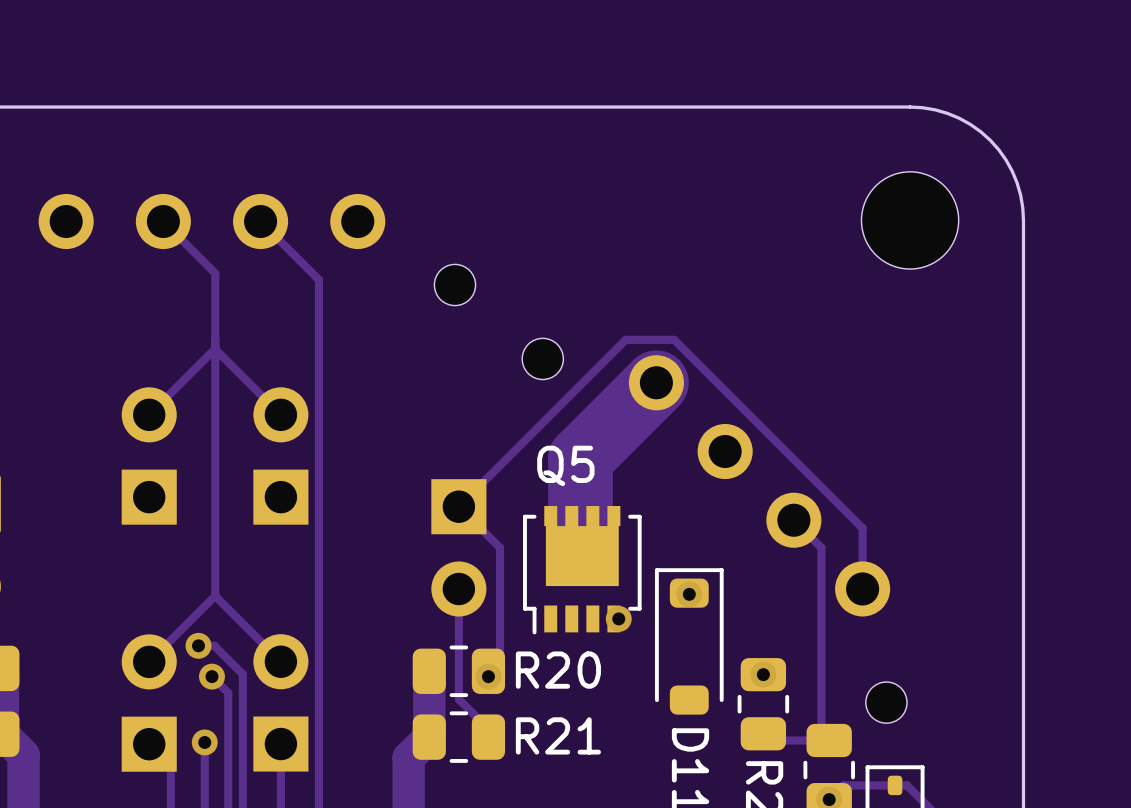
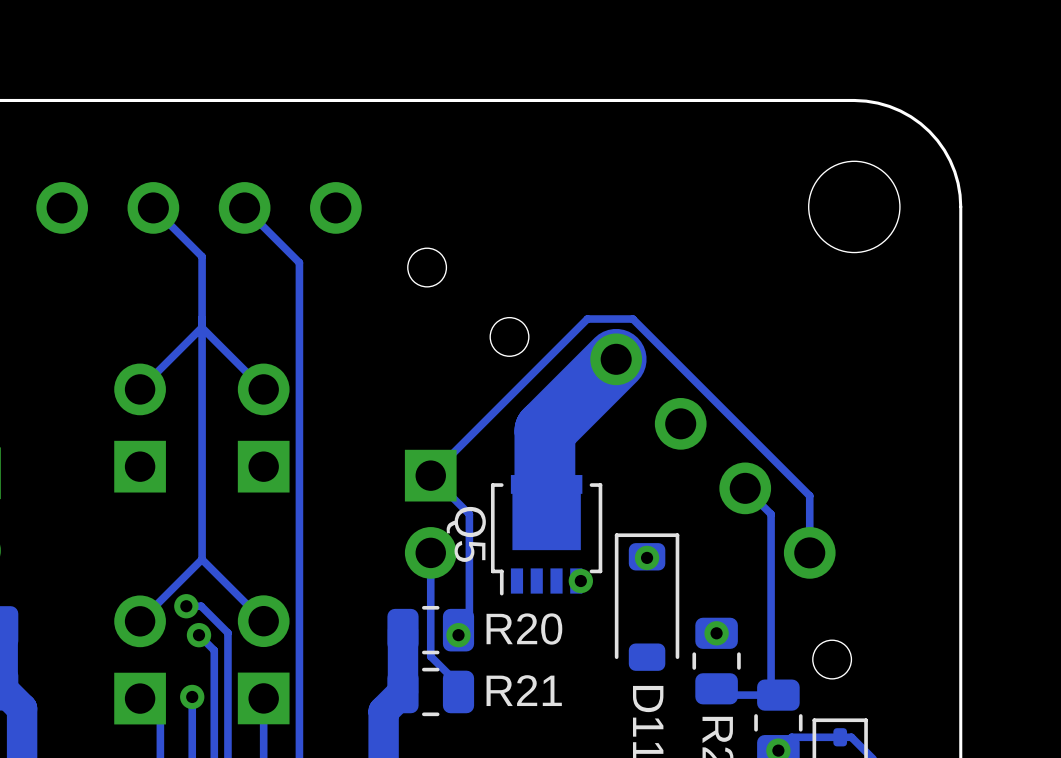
Q5 name rotation: 0° (565, 465) -> 90° clockwise (466, 534)
Q5 name position: Q5 (565, 465) -> Q5 (466, 534)

